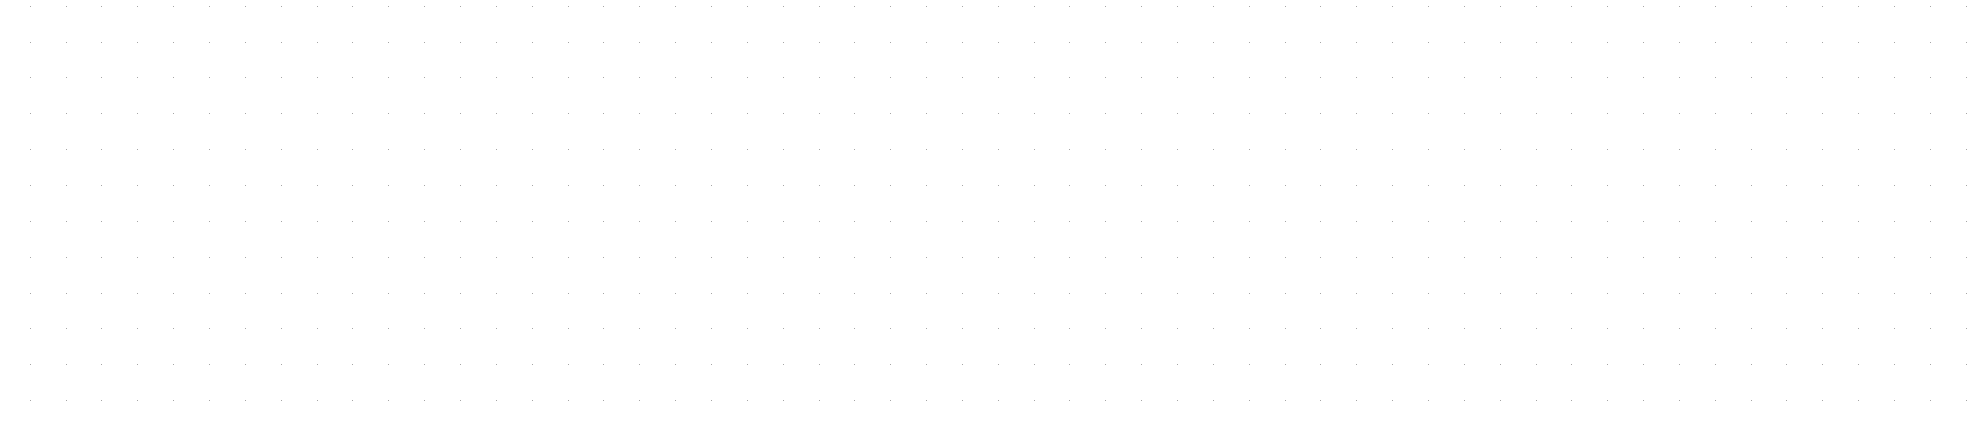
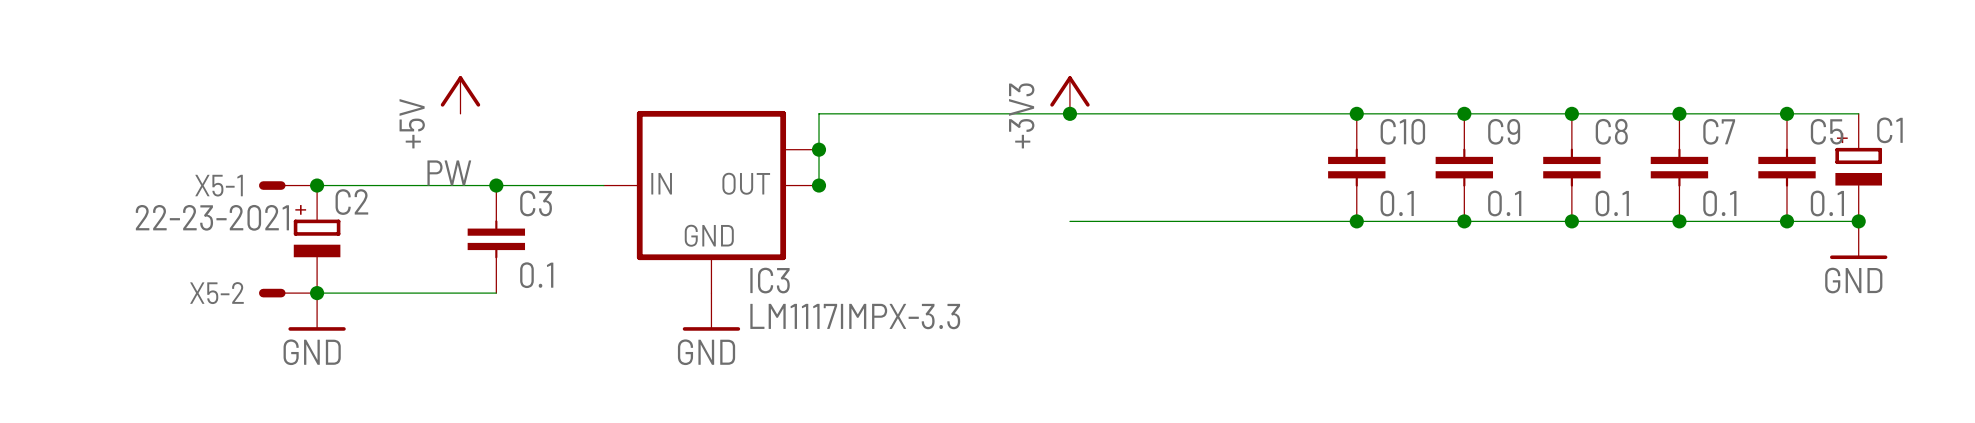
power symbol: none -> +5V (460, 95)
power symbol: none -> +3V3 (1069, 95)
junction: none -> (1069, 113)
junction: none -> (1356, 113)
junction: none -> (1464, 113)
junction: none -> (1571, 113)
junction: none -> (1679, 113)
junction: none -> (1786, 113)
wire: none -> (1858, 113) (819, 113) (819, 185)
junction: none -> (819, 149)
C10: none -> 0.1 (1356, 167)
C9: none -> 0.1 (1464, 167)
C8: none -> 0.1 (1571, 167)
C7: none -> 0.1 (1679, 167)
C5: none -> 0.1 (1786, 167)
C1: none -> (1858, 167)
label: none -> PW (449, 172)
X5-1: none -> 22-23-2021 (288, 185)
wire: none -> (317, 185) (603, 185)
junction: none -> (317, 185)
junction: none -> (496, 185)
junction: none -> (819, 185)
IC3: none -> LM1117IMPX-3.3 (711, 202)
wire: none -> (1069, 221) (1858, 221)
junction: none -> (1356, 221)
junction: none -> (1464, 221)
junction: none -> (1571, 221)
junction: none -> (1679, 221)
junction: none -> (1786, 221)
junction: none -> (1858, 221)
C2: none -> (317, 239)
C3: none -> 0.1 (496, 239)
power symbol: none -> GND (1858, 240)
X5-2: none -> (288, 293)
wire: none -> (317, 293) (496, 293)
junction: none -> (317, 293)
power symbol: none -> GND (317, 311)
power symbol: none -> GND (711, 311)

